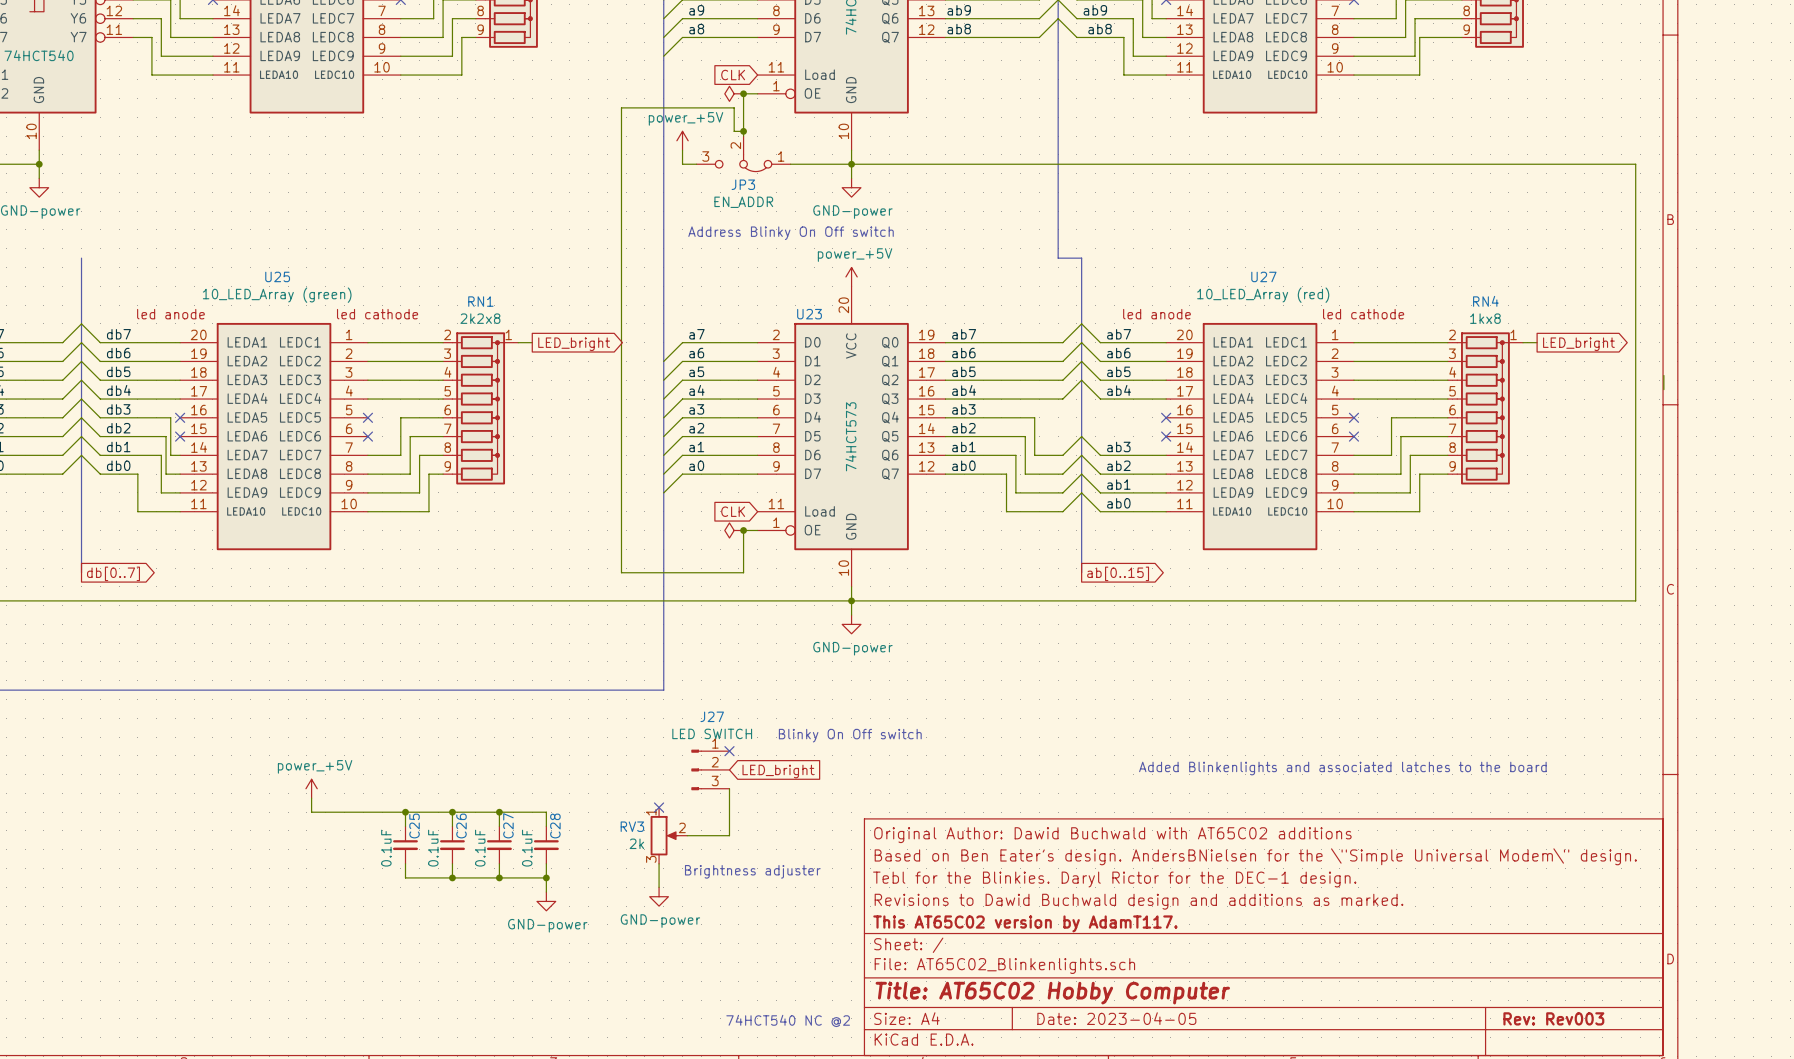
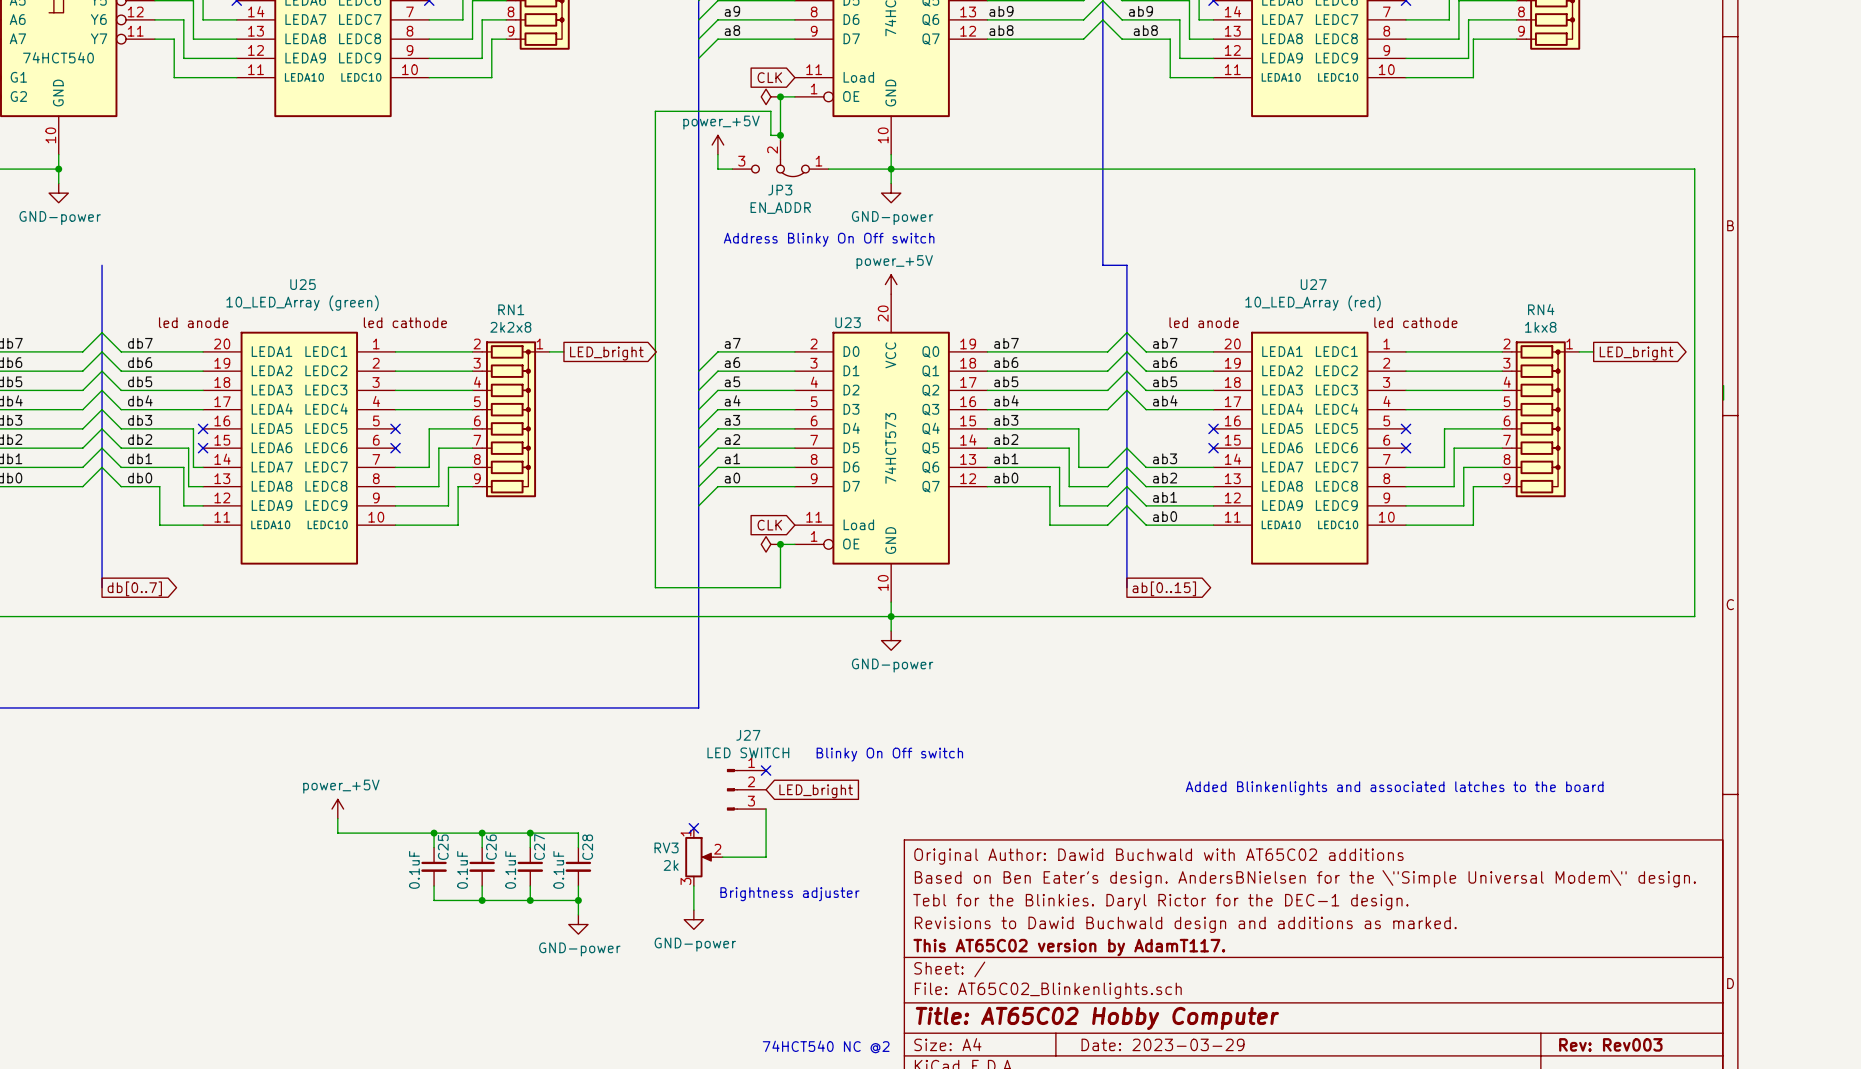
title block: Date: 2023-04-05 (1116, 1018) -> Date: 2023-03-29 (1163, 1044)

